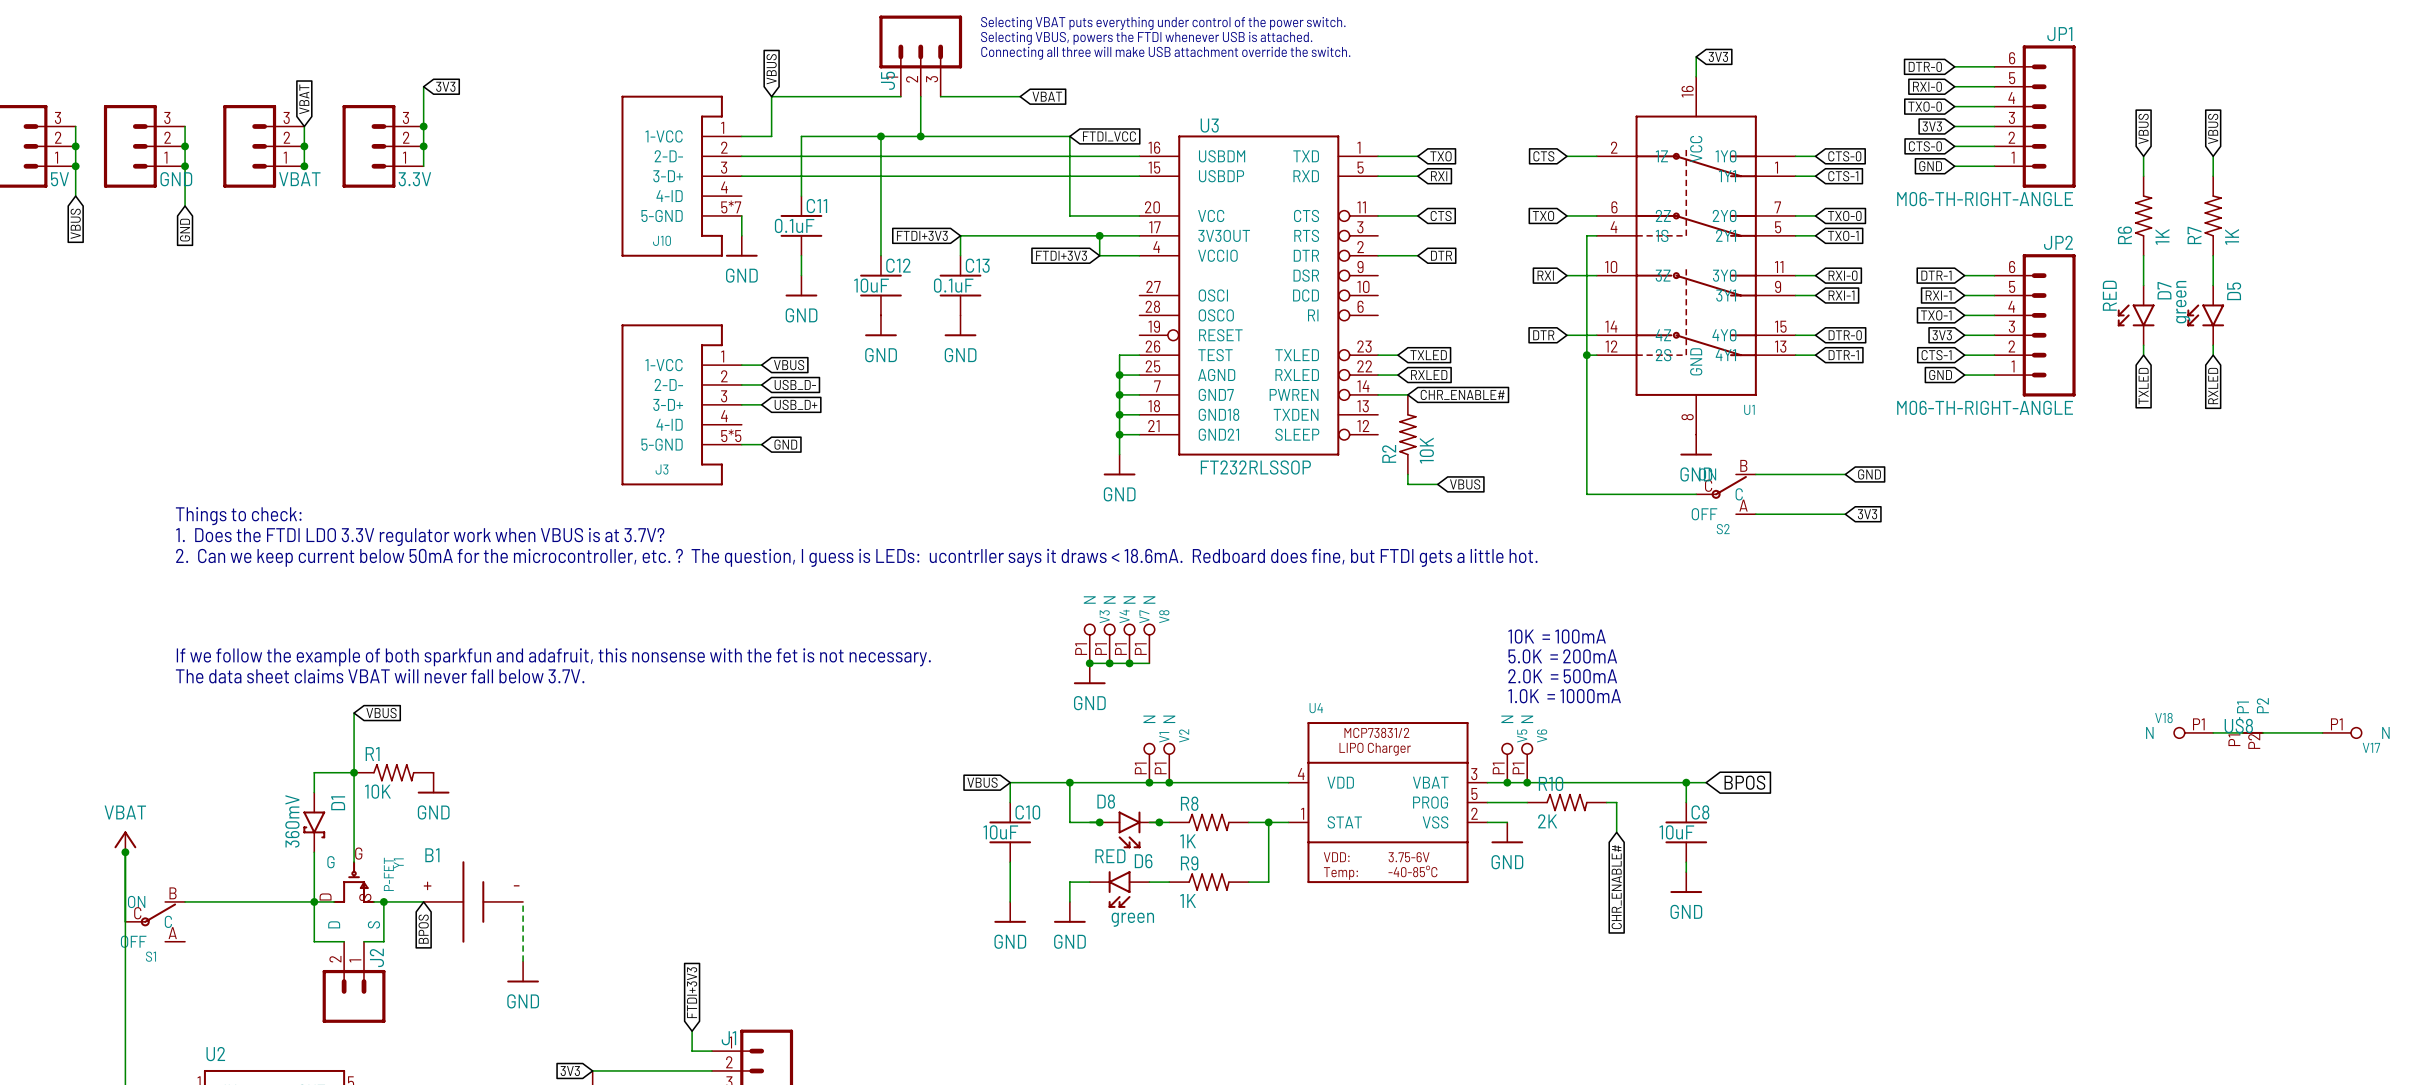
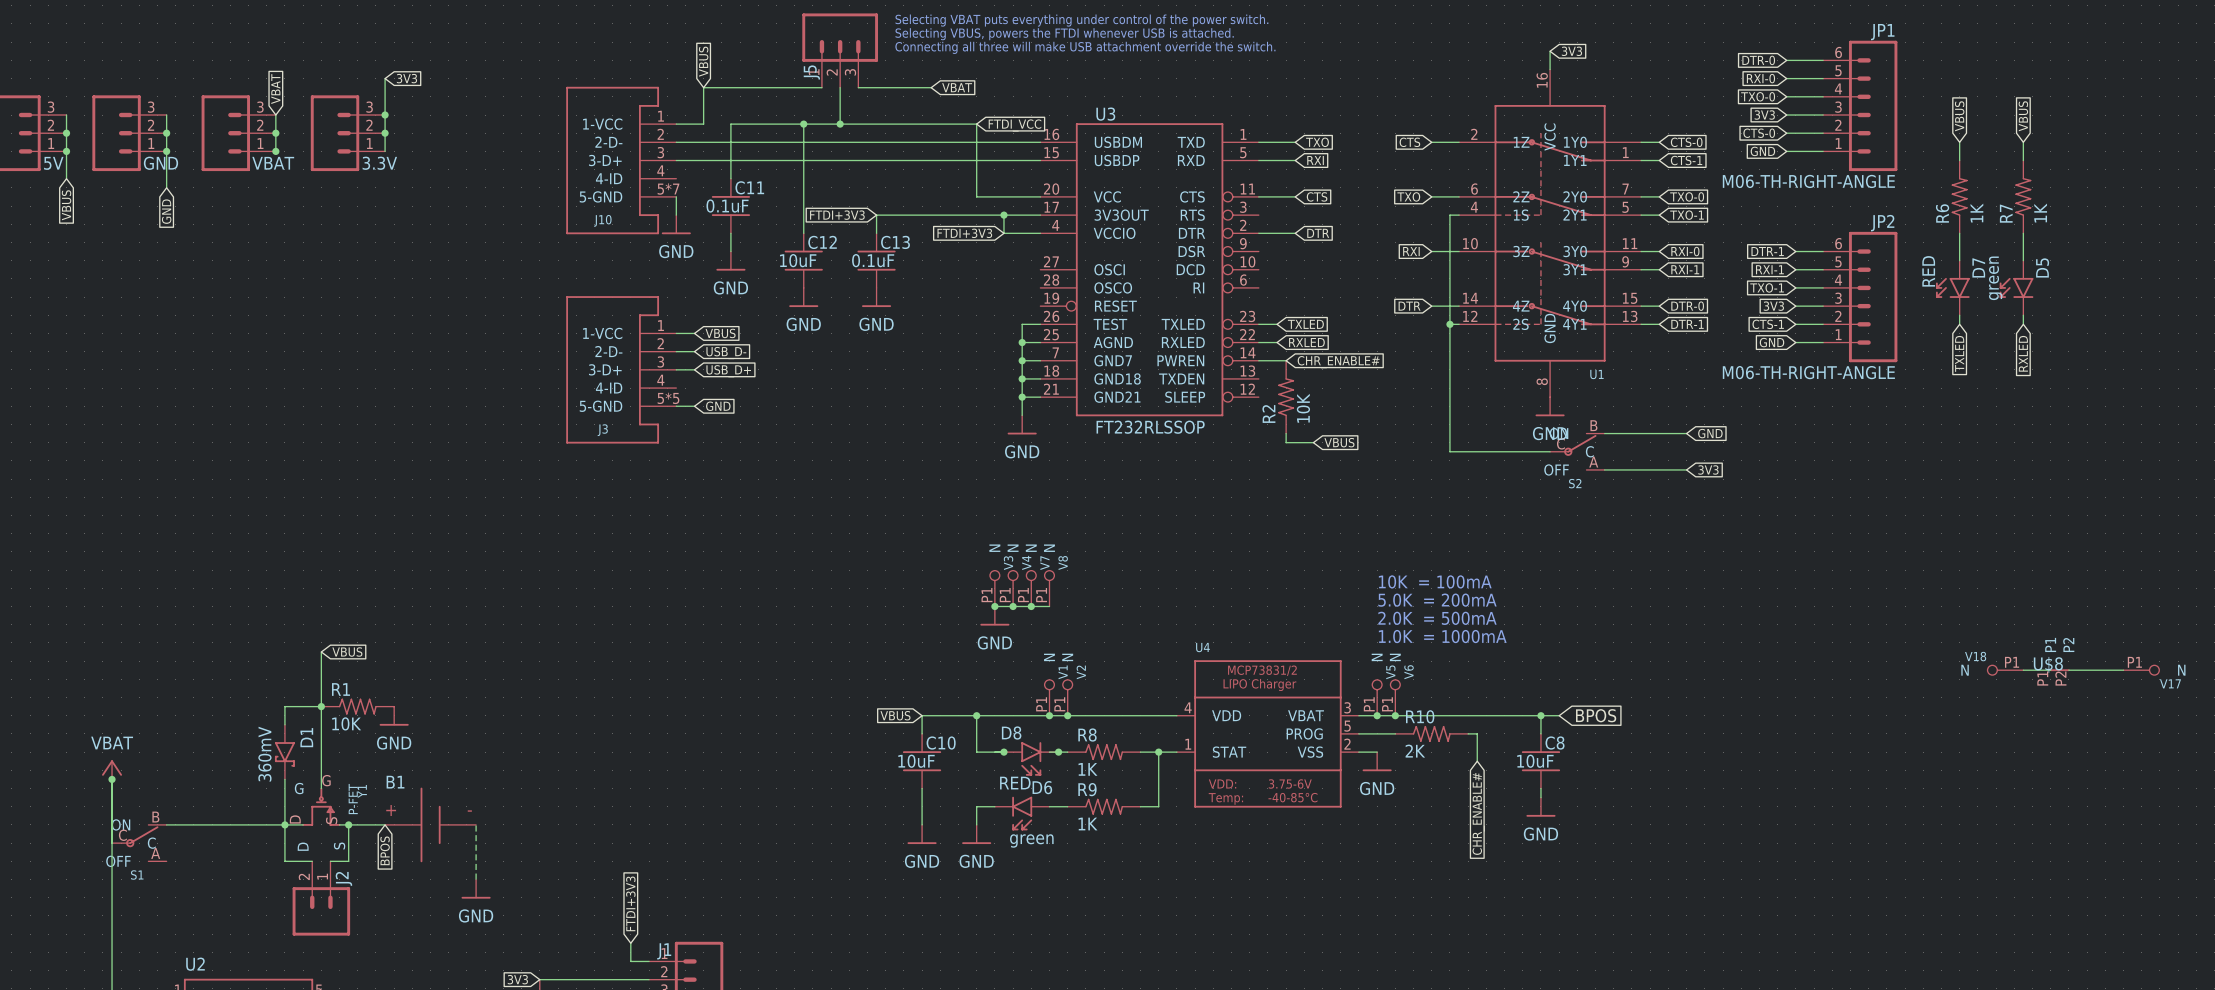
text: Things to check: (238, 516) -> none
text: 1. Does the FTDI LDO 3.3V regulator work when VBUS is at 3.7V? (420, 536) -> none
text: 2. Can we keep current below 50mA for the microcontroller, etc. ? The question, I guess is LEDs: ucontrller says it draws < 18.6mA. Redboard does fine, but FTDI gets a little hot. (856, 557) -> none
text: If we follow the example of both sparkfun and adafruit, this nonsense with the fet is not necessary. (553, 657) -> none
text: The data sheet claims VBAT will never fall below 3.7V. (380, 676) -> none

